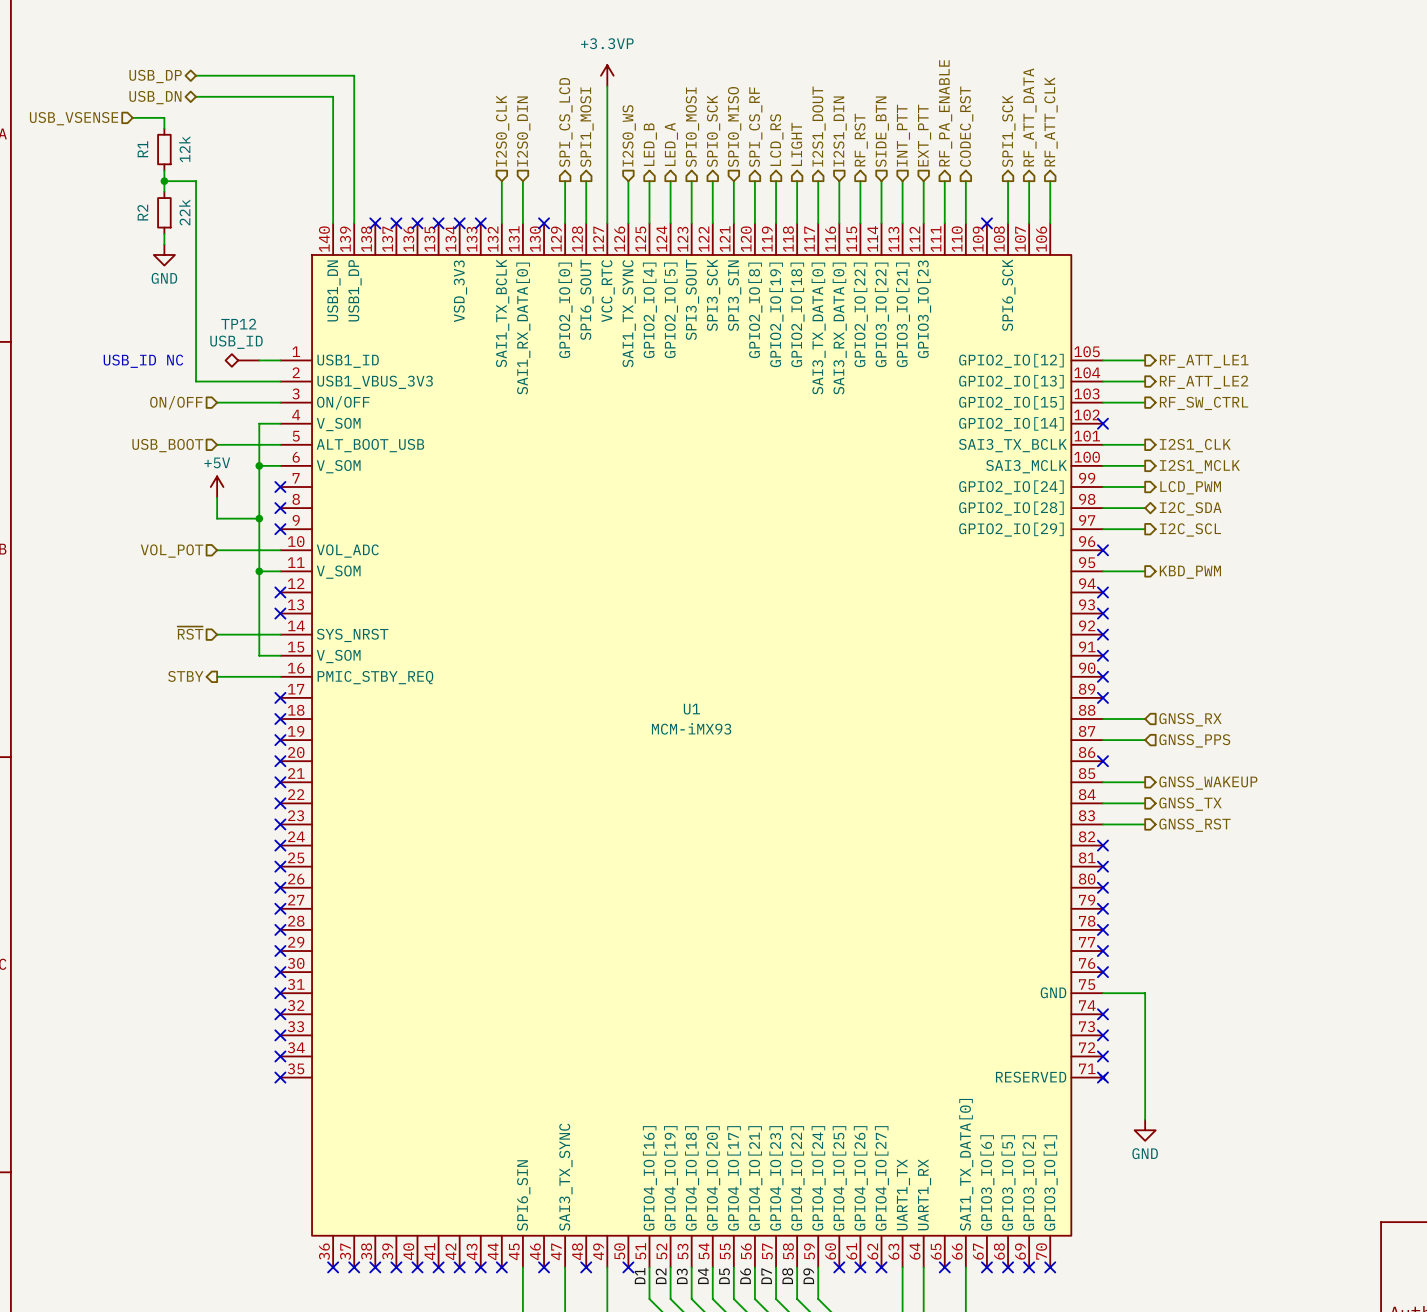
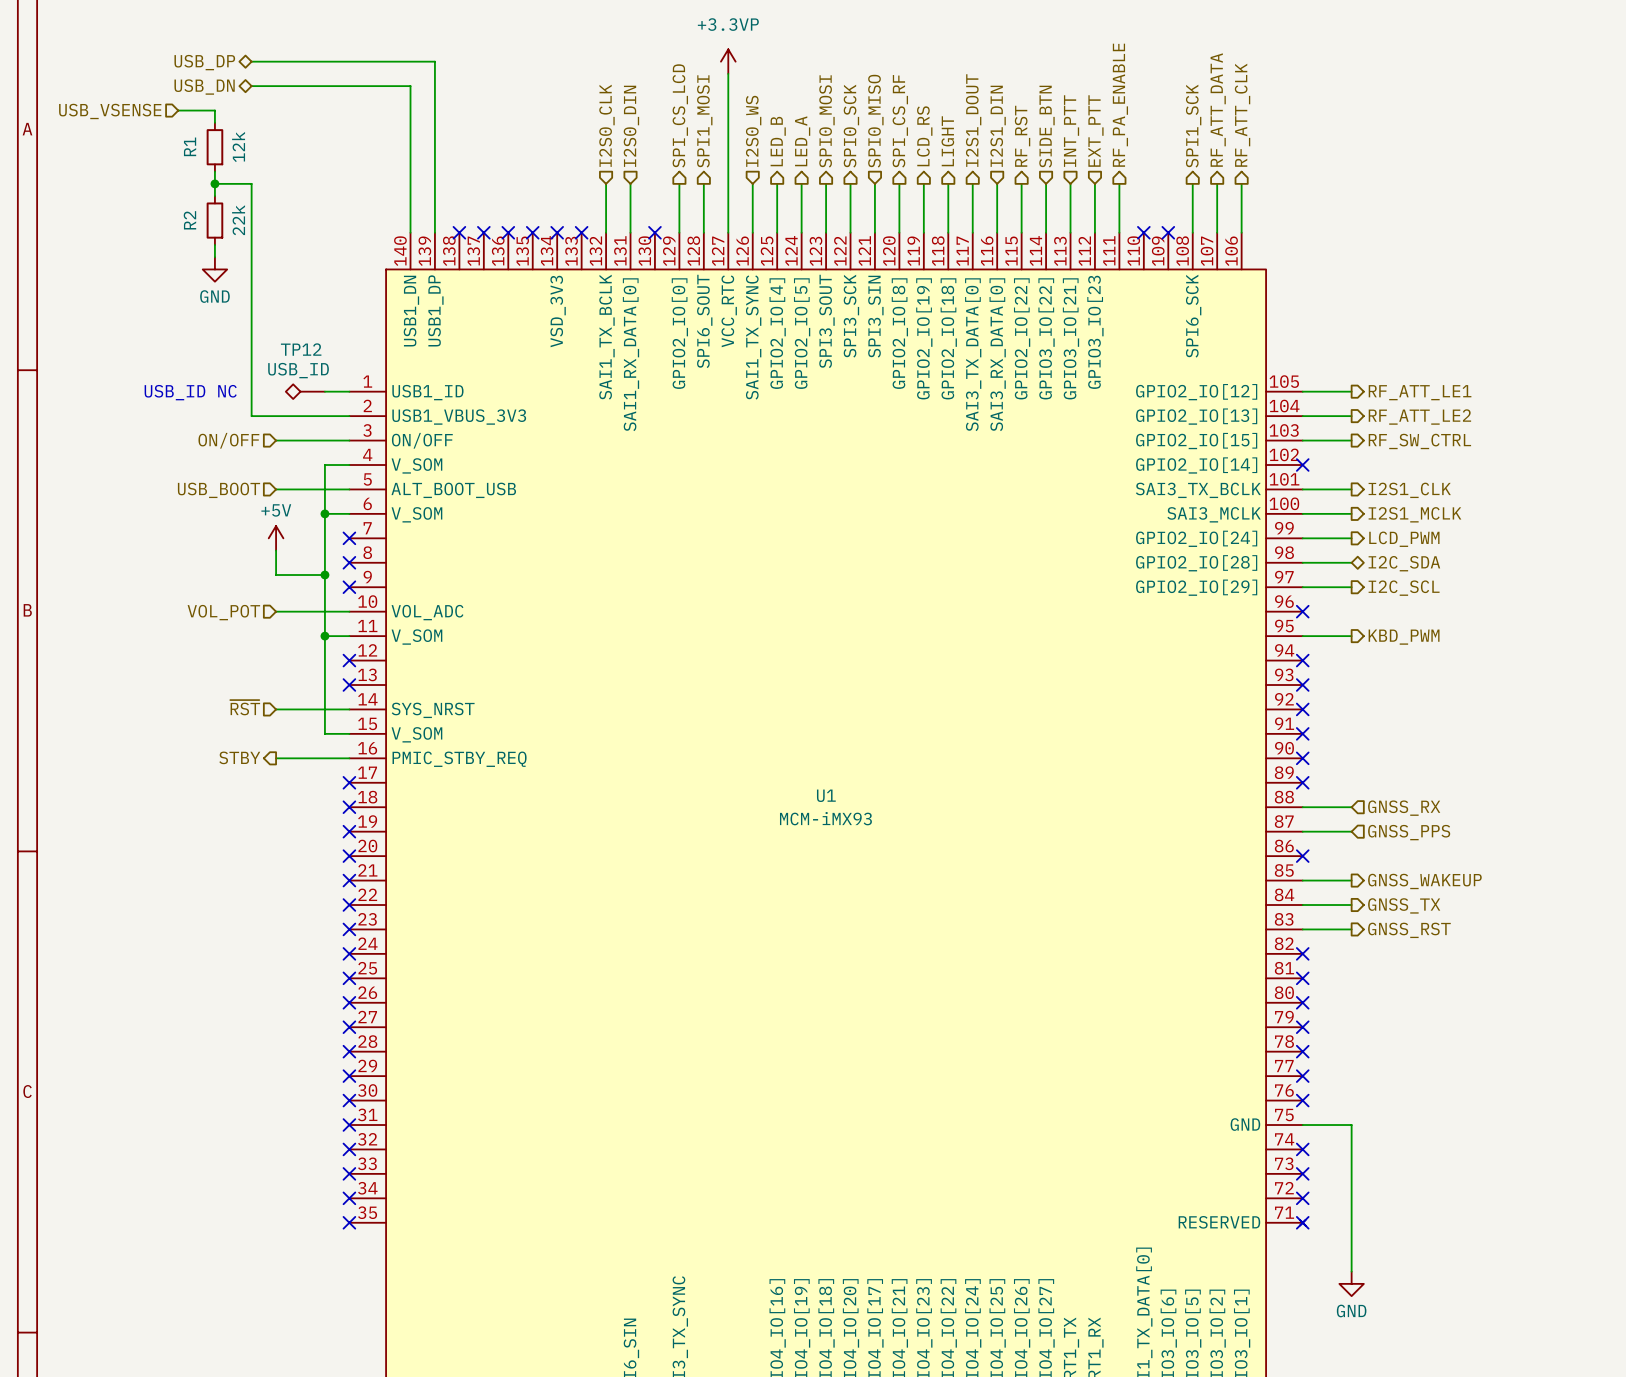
hierarchical label: CODEC_RST (966, 126) -> none
wire: (965, 181) (965, 223) -> none
no-connect mark: none -> (1143, 232)

